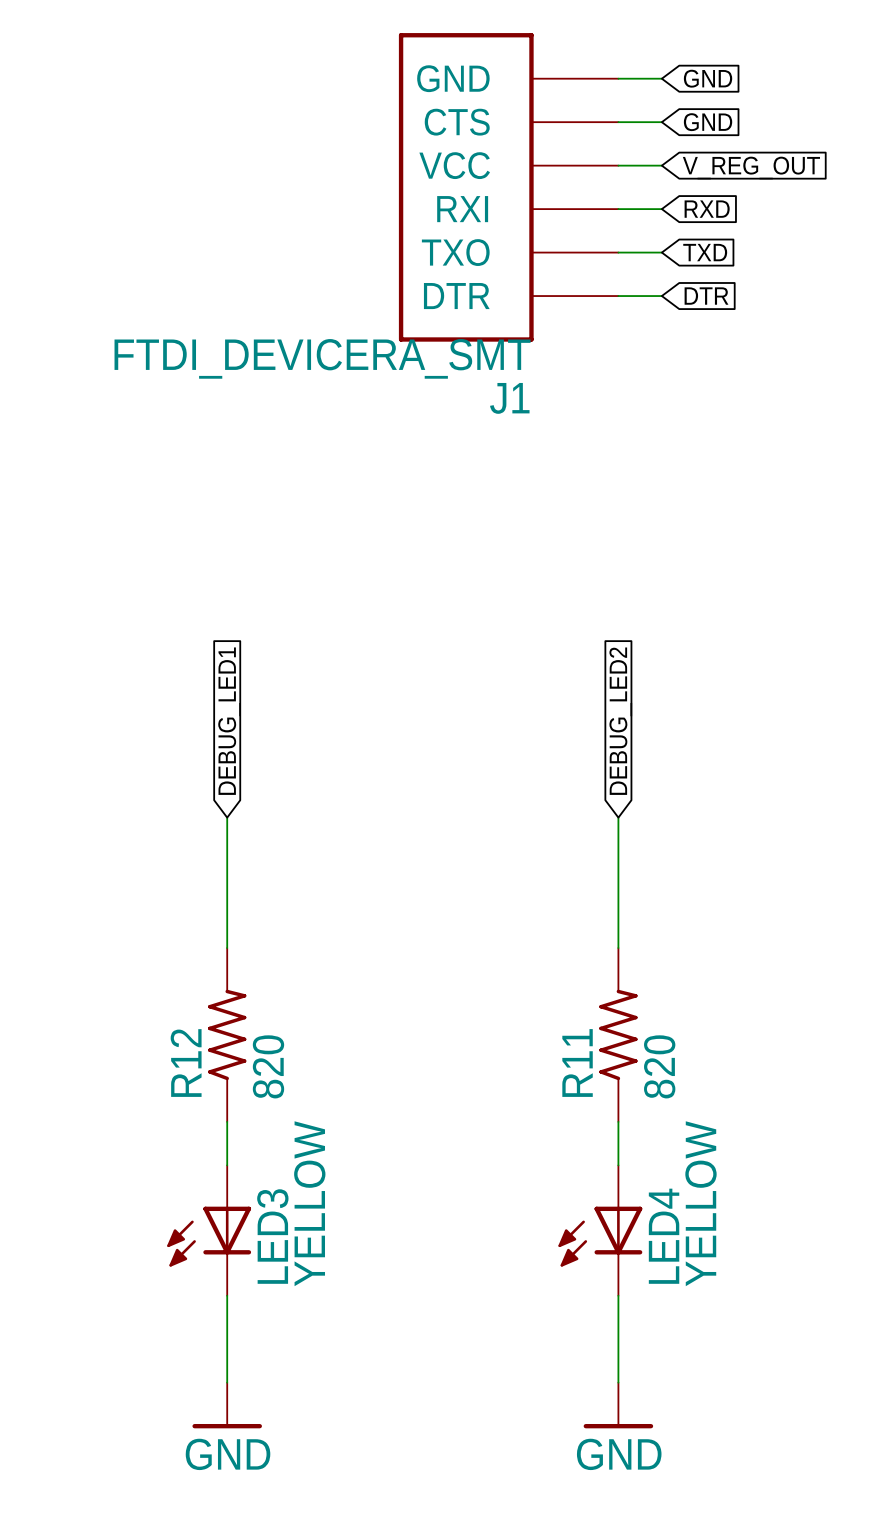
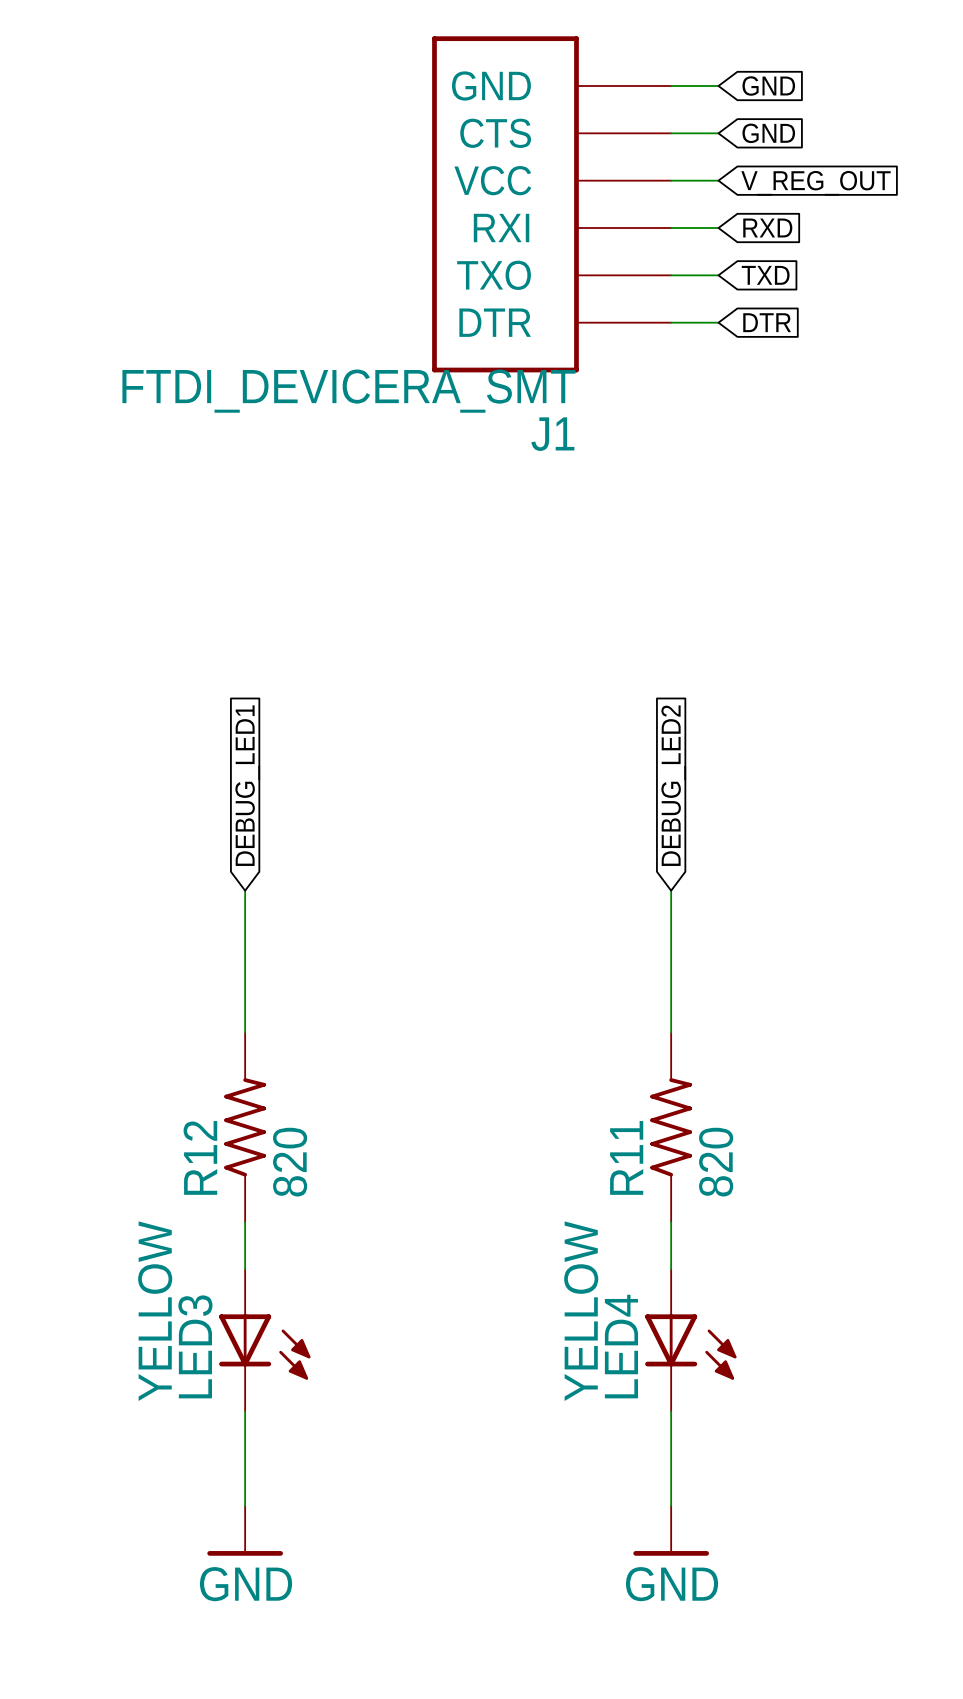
LED3 flip: as is (209, 1236) -> left-right (264, 1347)
LED4 flip: as is (600, 1236) -> left-right (690, 1347)

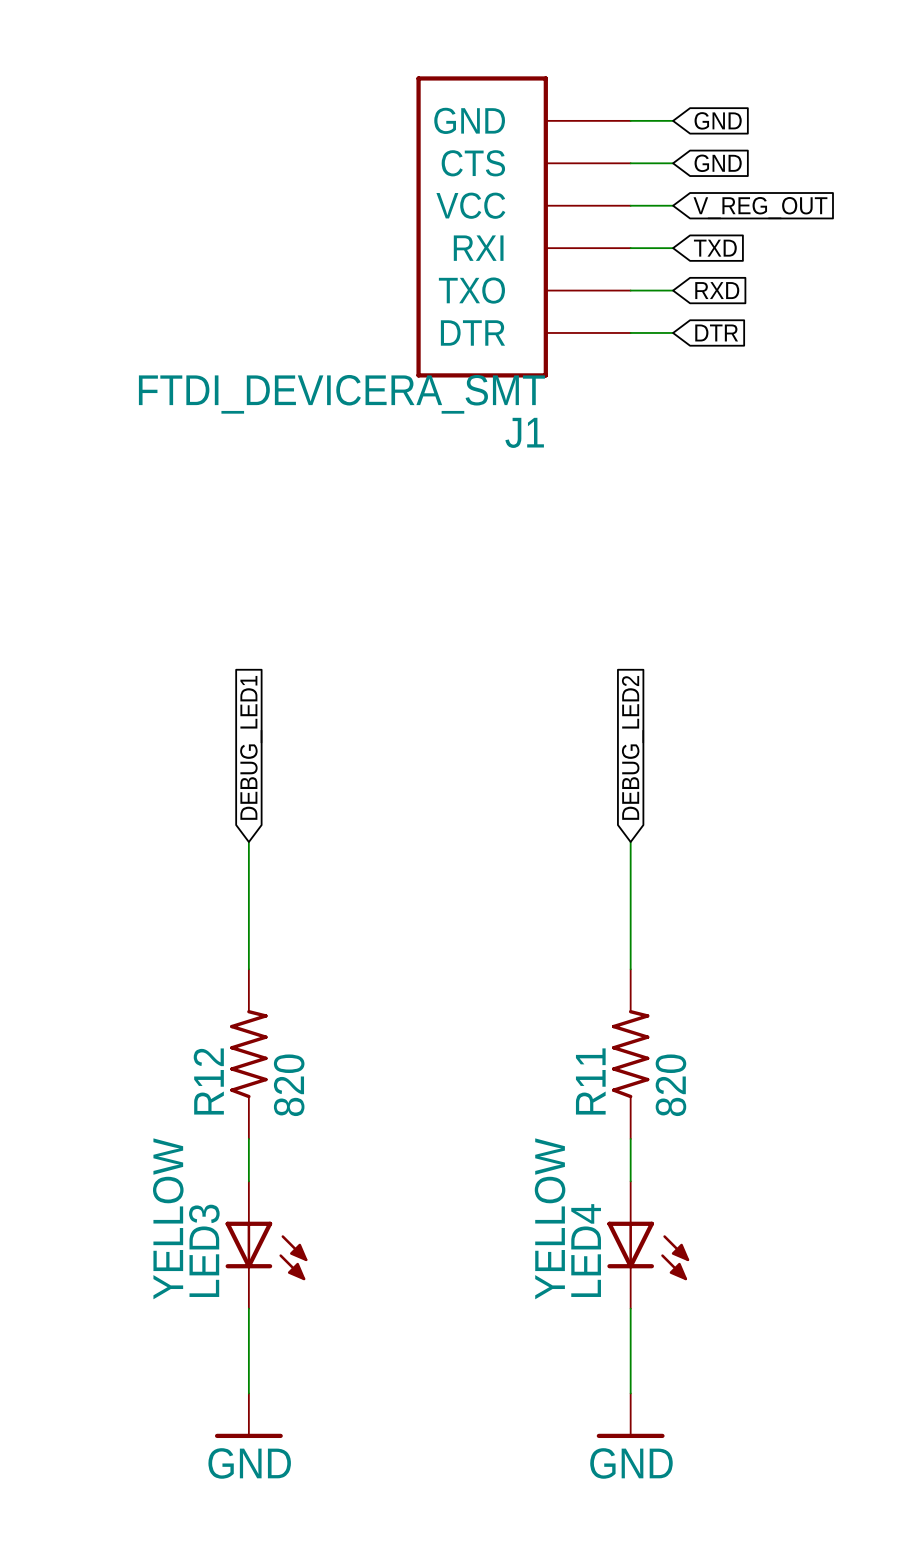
global label: RXD (767, 228) -> TXD (715, 248)
global label: TXD (765, 275) -> RXD (717, 290)

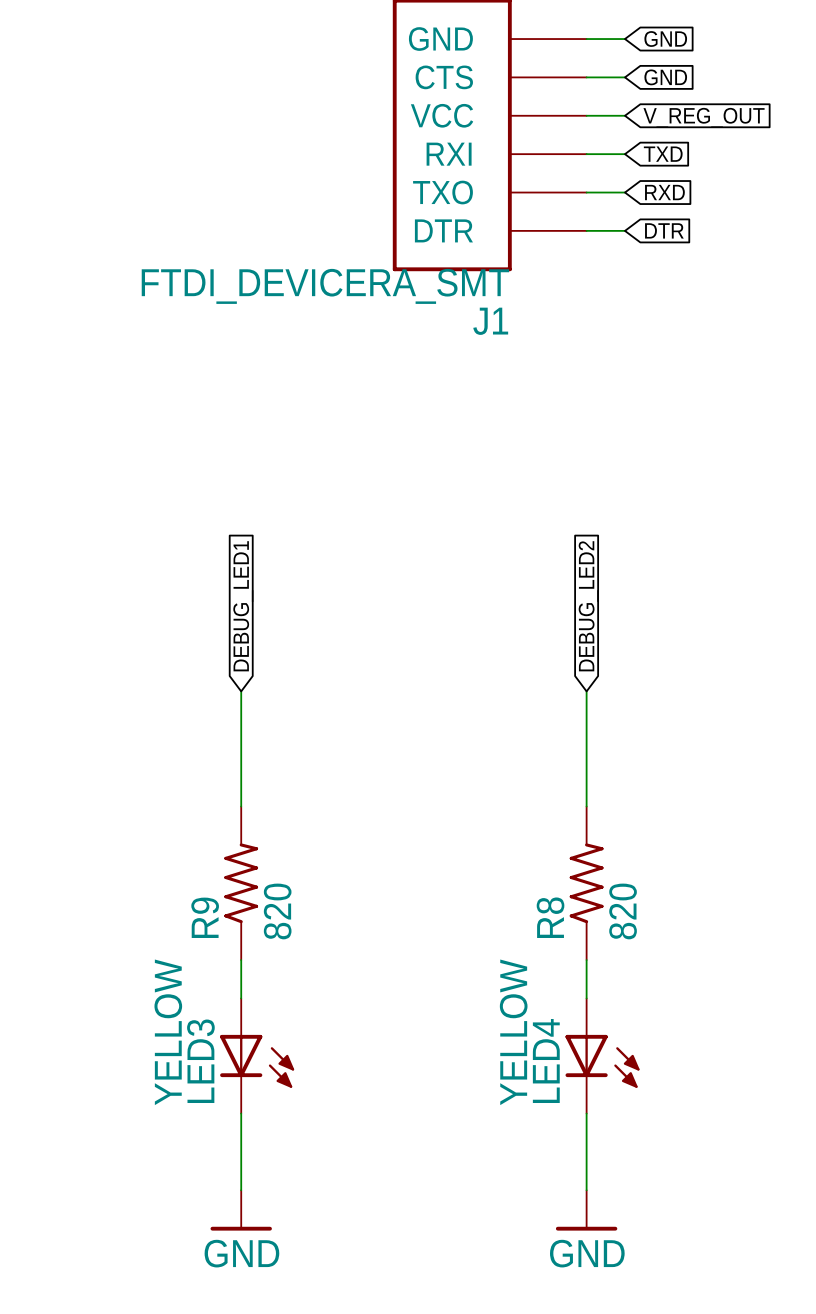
R12 name: R12 (208, 1081) -> R9 (205, 917)
R11 name: R11 (590, 1081) -> R8 (550, 917)

